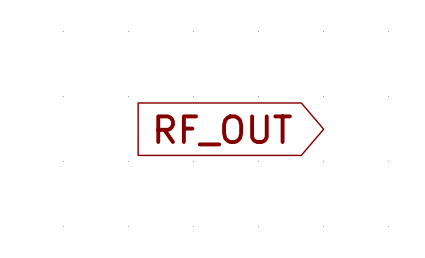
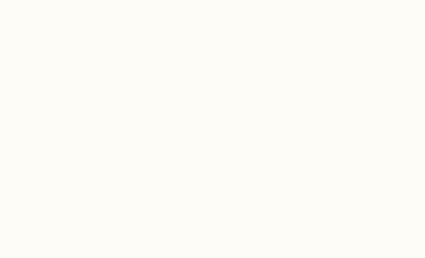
global label: RF_OUT (224, 130) -> none

